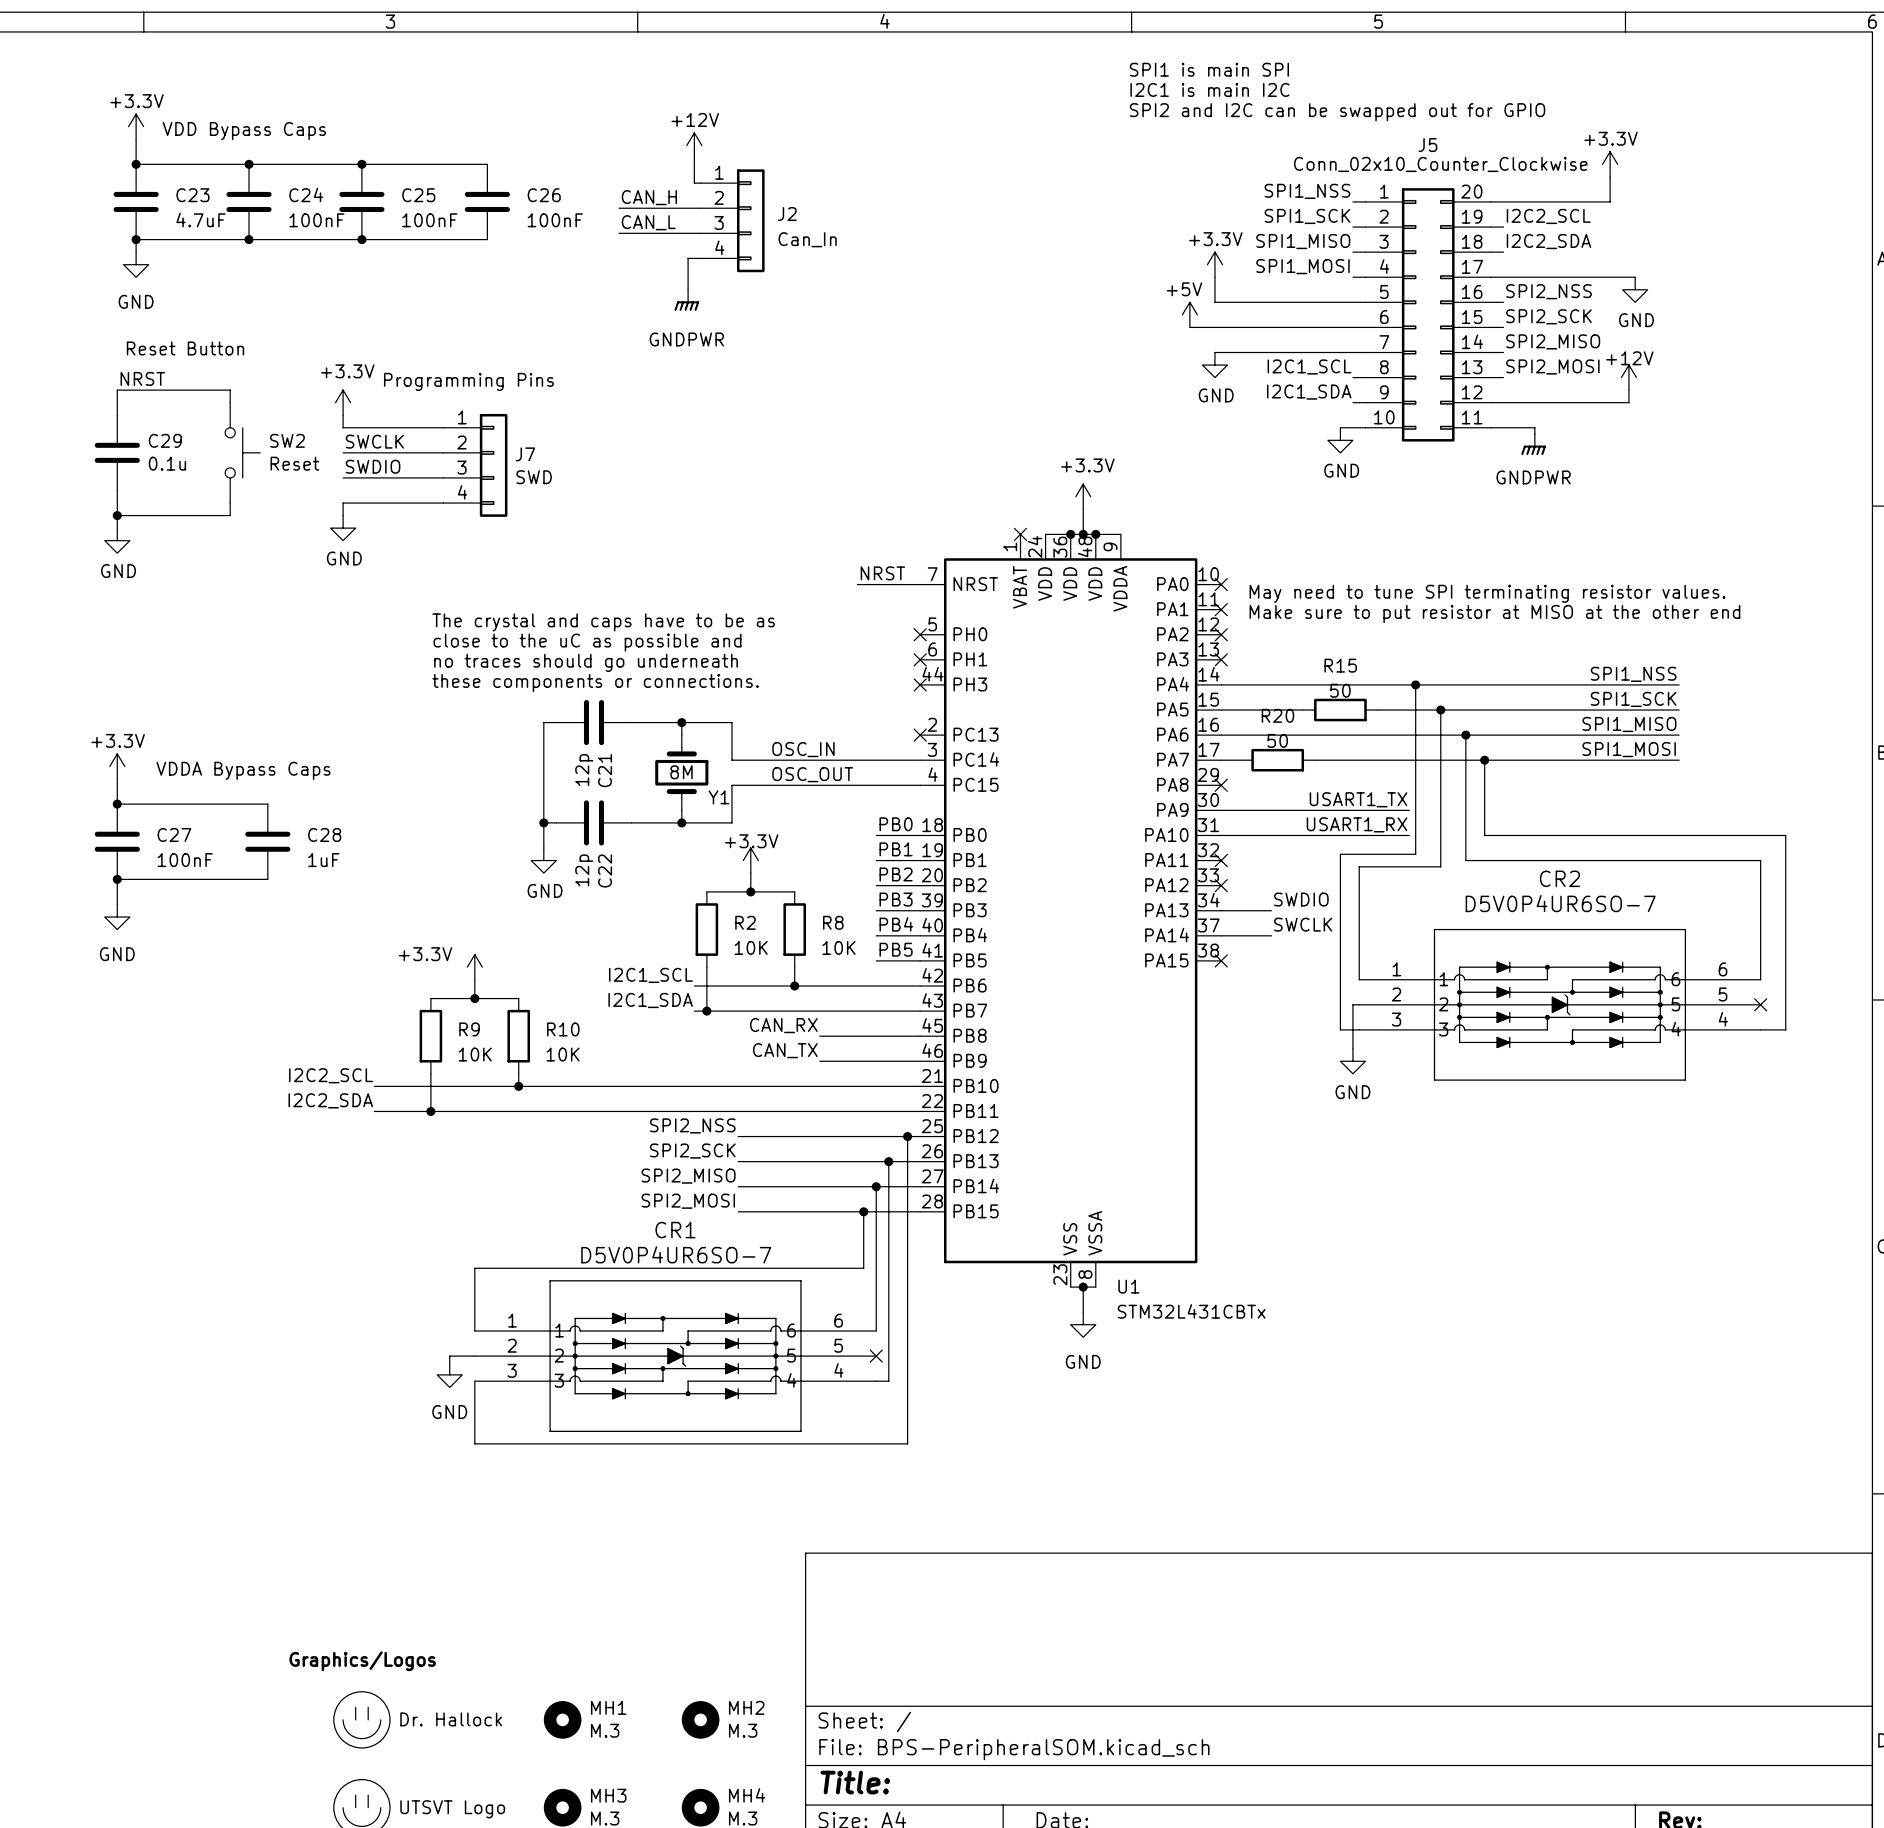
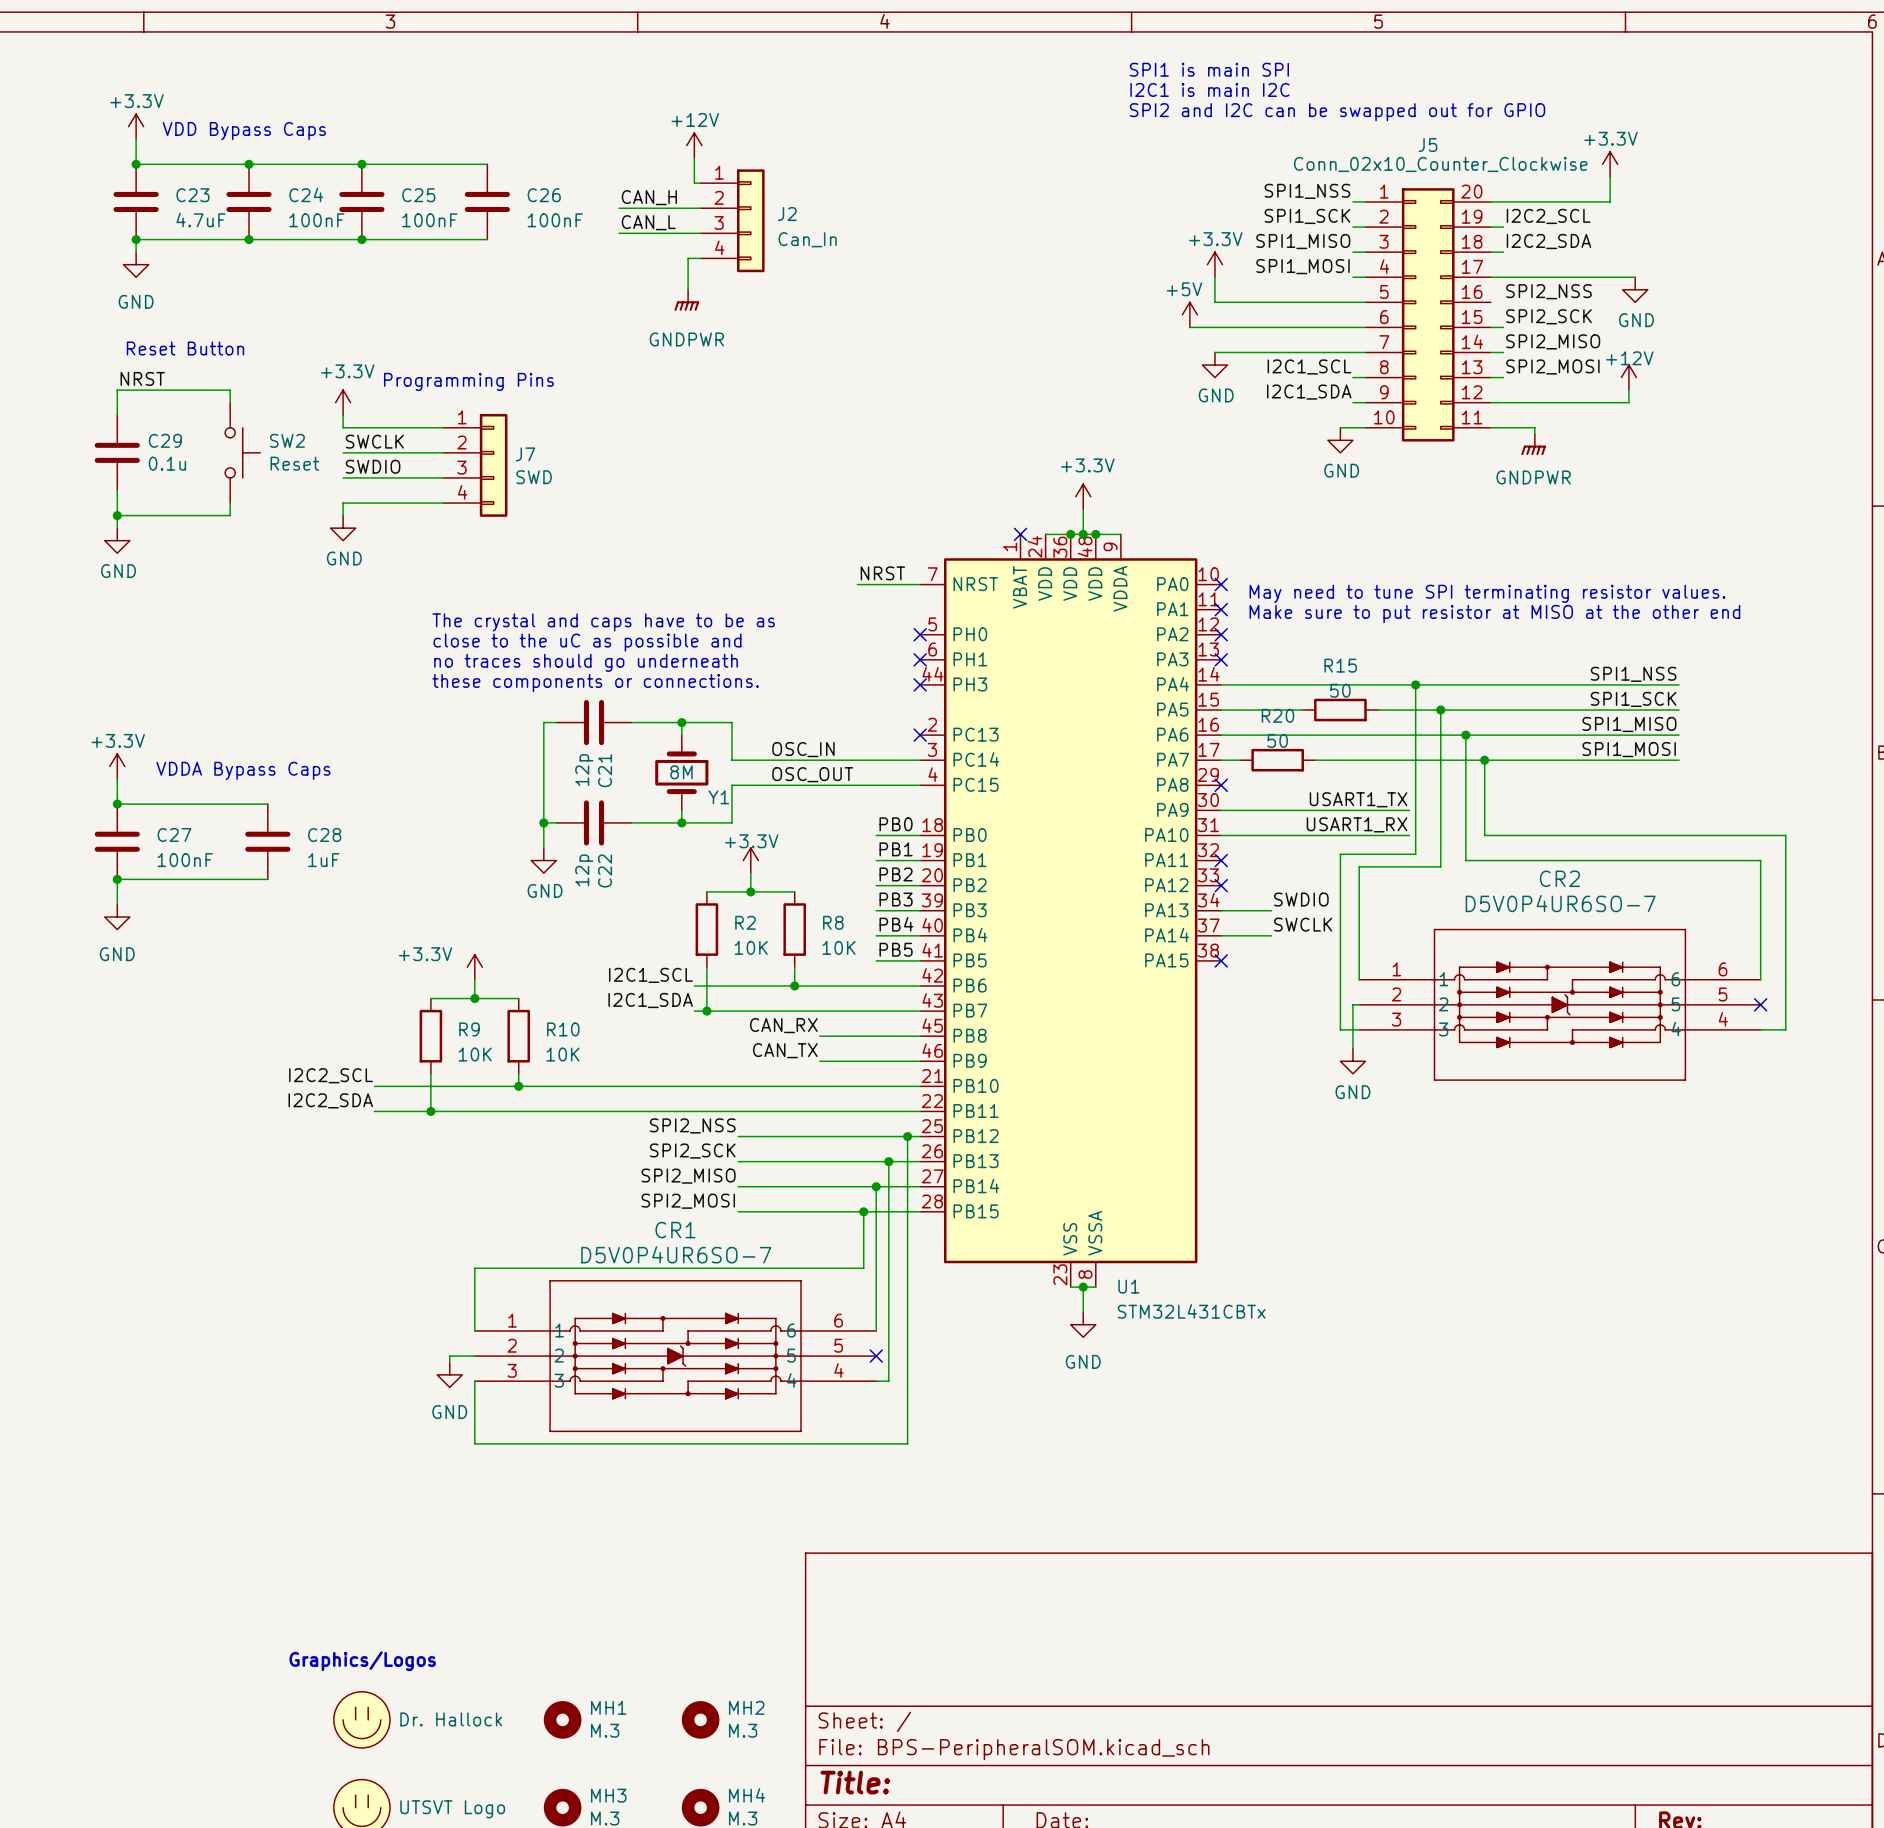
wire: (1490, 302) (1503, 302) -> none

